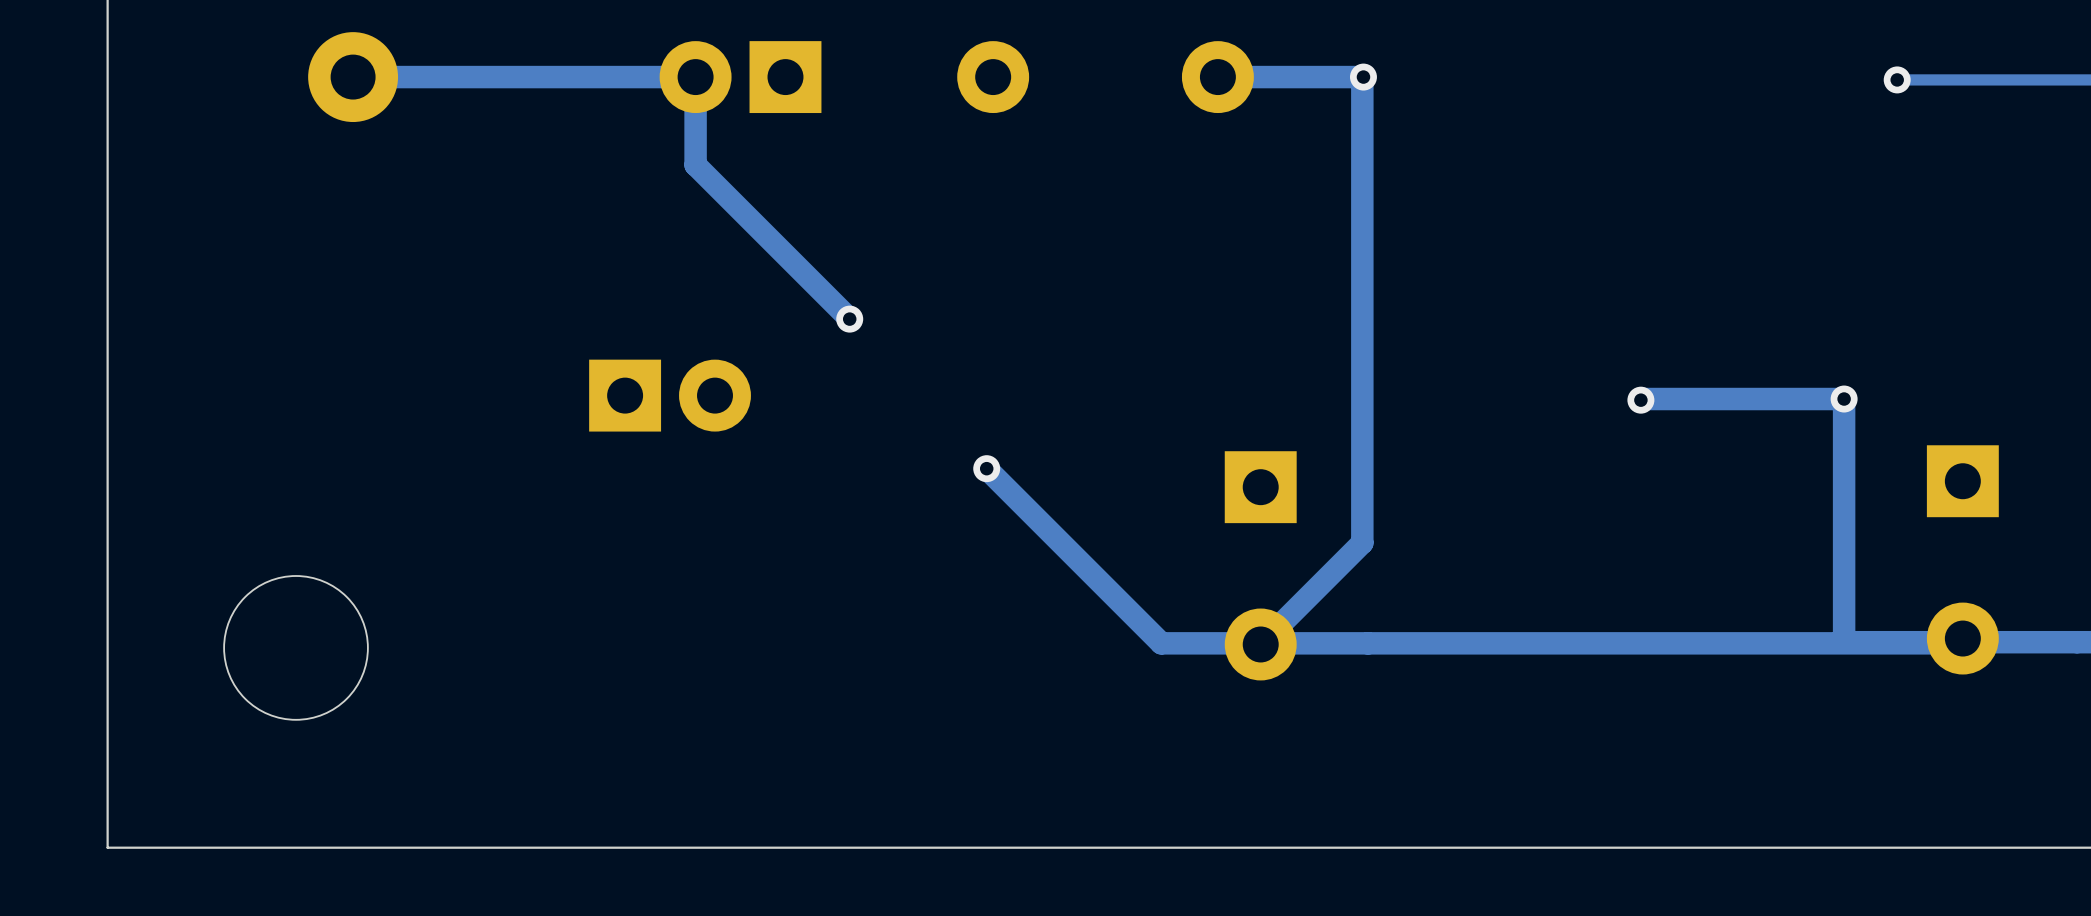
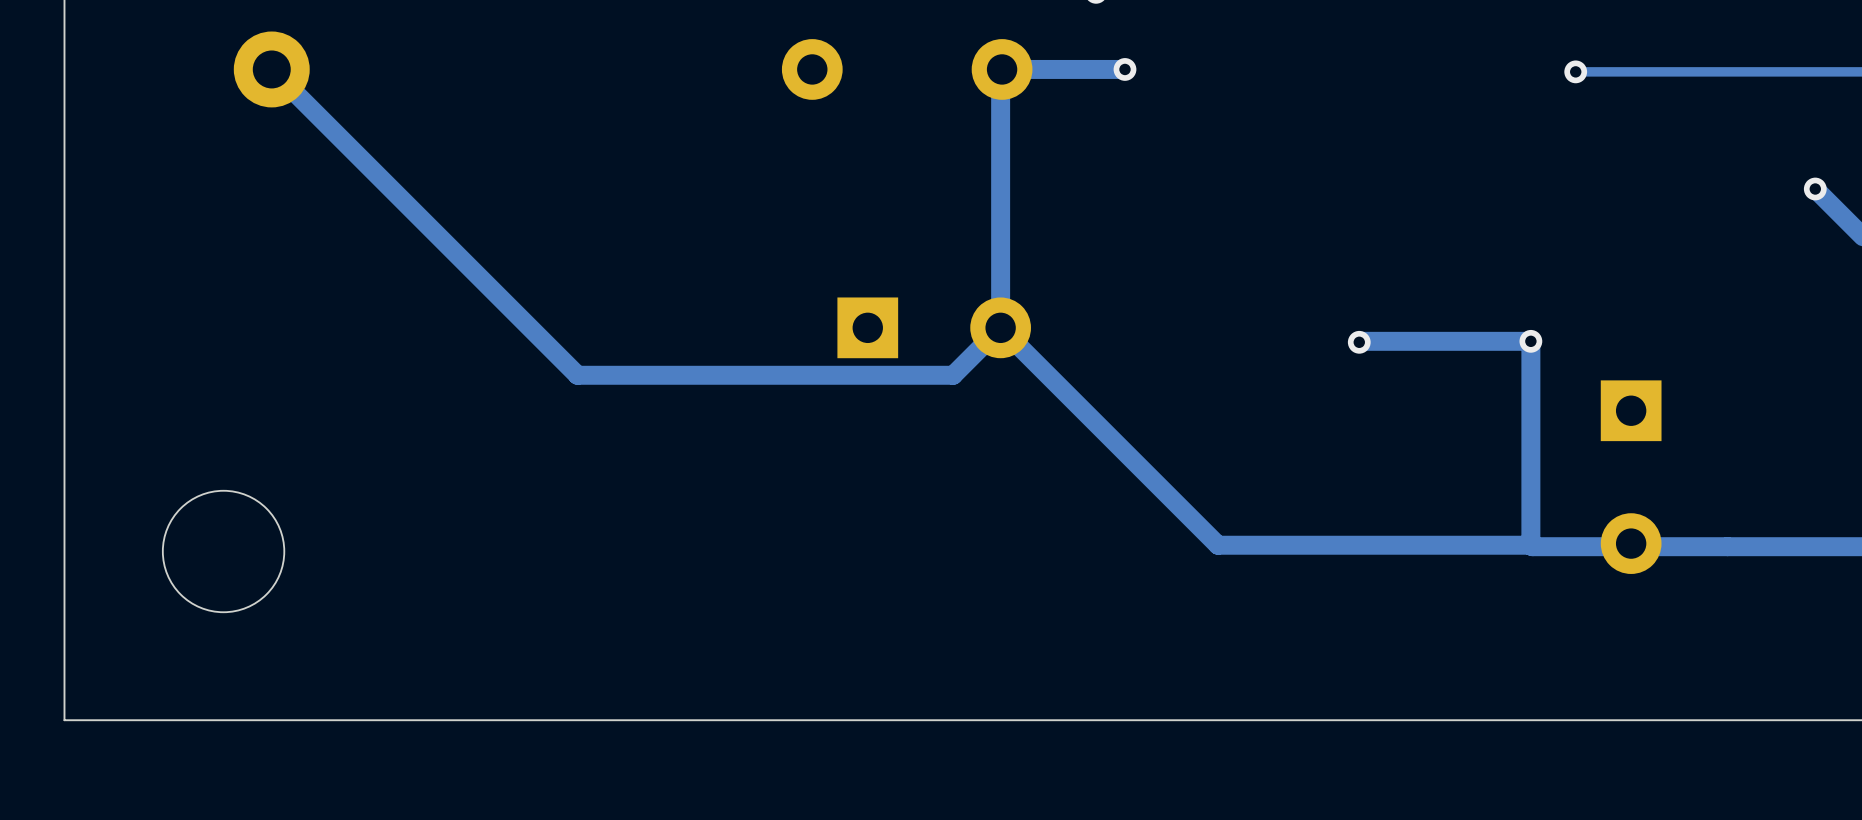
track: (353, 77) (695, 77) (695, 164) (849, 319) -> (271, 69) (577, 375) (953, 375) (1000, 327)
part: (740, 77) -> none
track: none -> (1002, 69) (1000, 327)
track: (1362, 78) (1362, 542) (1260, 644) -> none
via: (849, 319) -> none
track: none -> (1000, 327) (1218, 545) (1530, 545)
part: (670, 395) -> none
track: (986, 468) (1161, 643) (1958, 643) -> none
via: (986, 468) -> none
part rotation: 0° (1260, 565) -> 90° counterclockwise (934, 327)
part position: (1260, 565) -> (934, 327)

